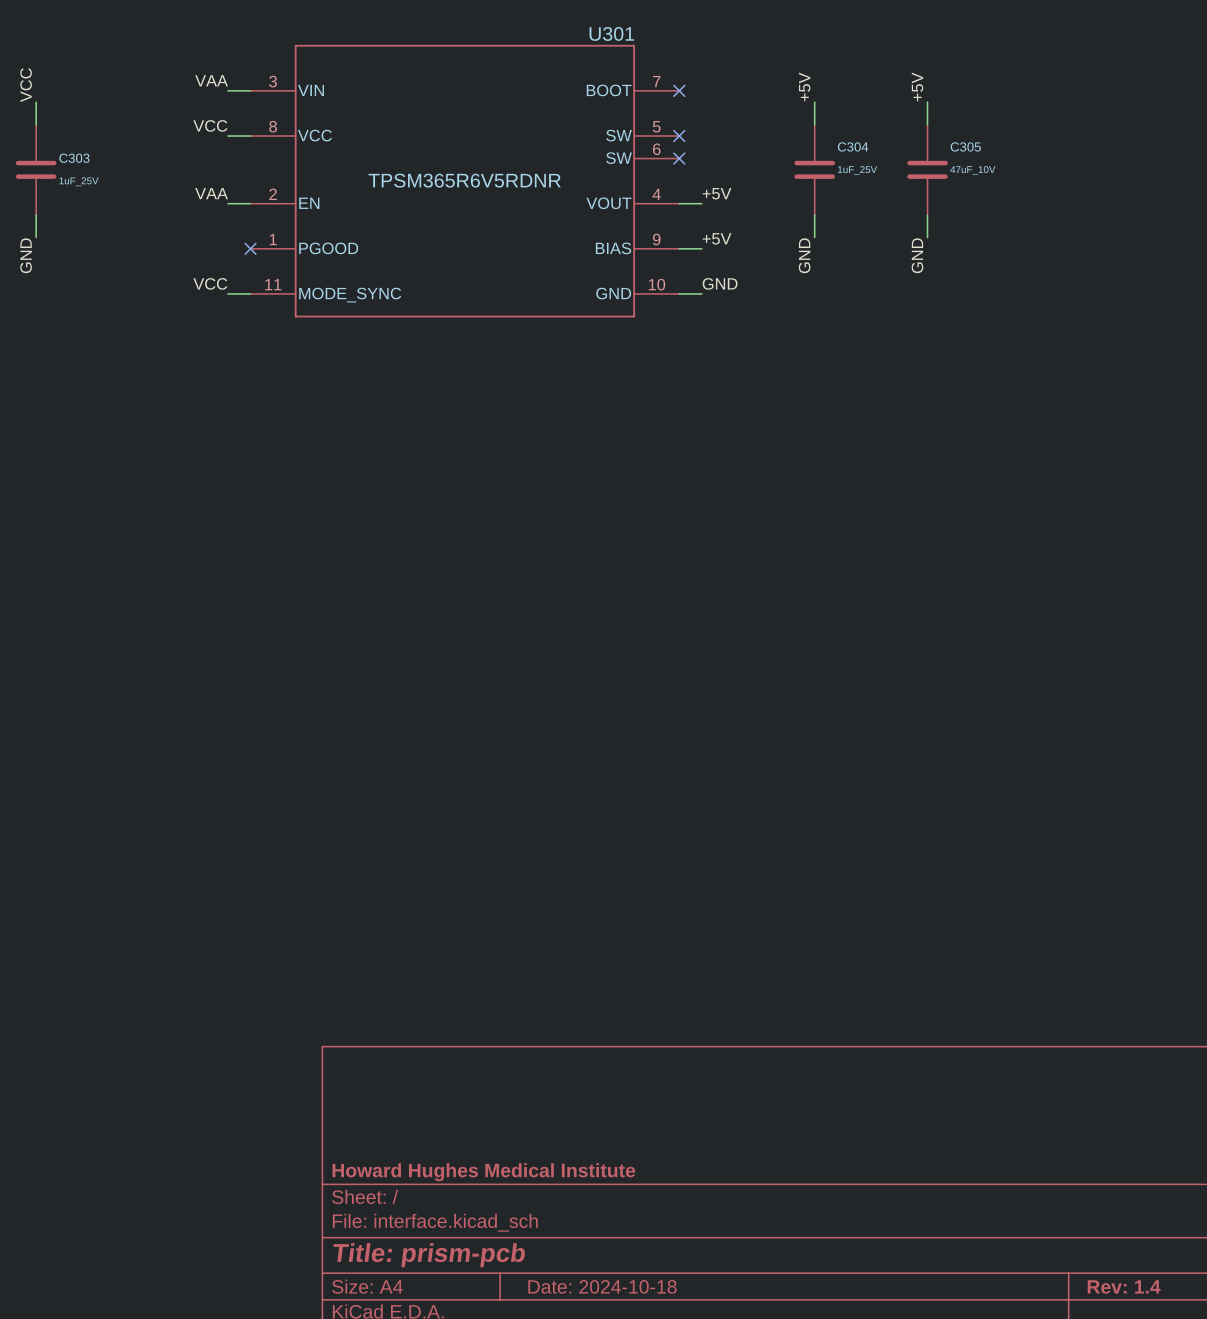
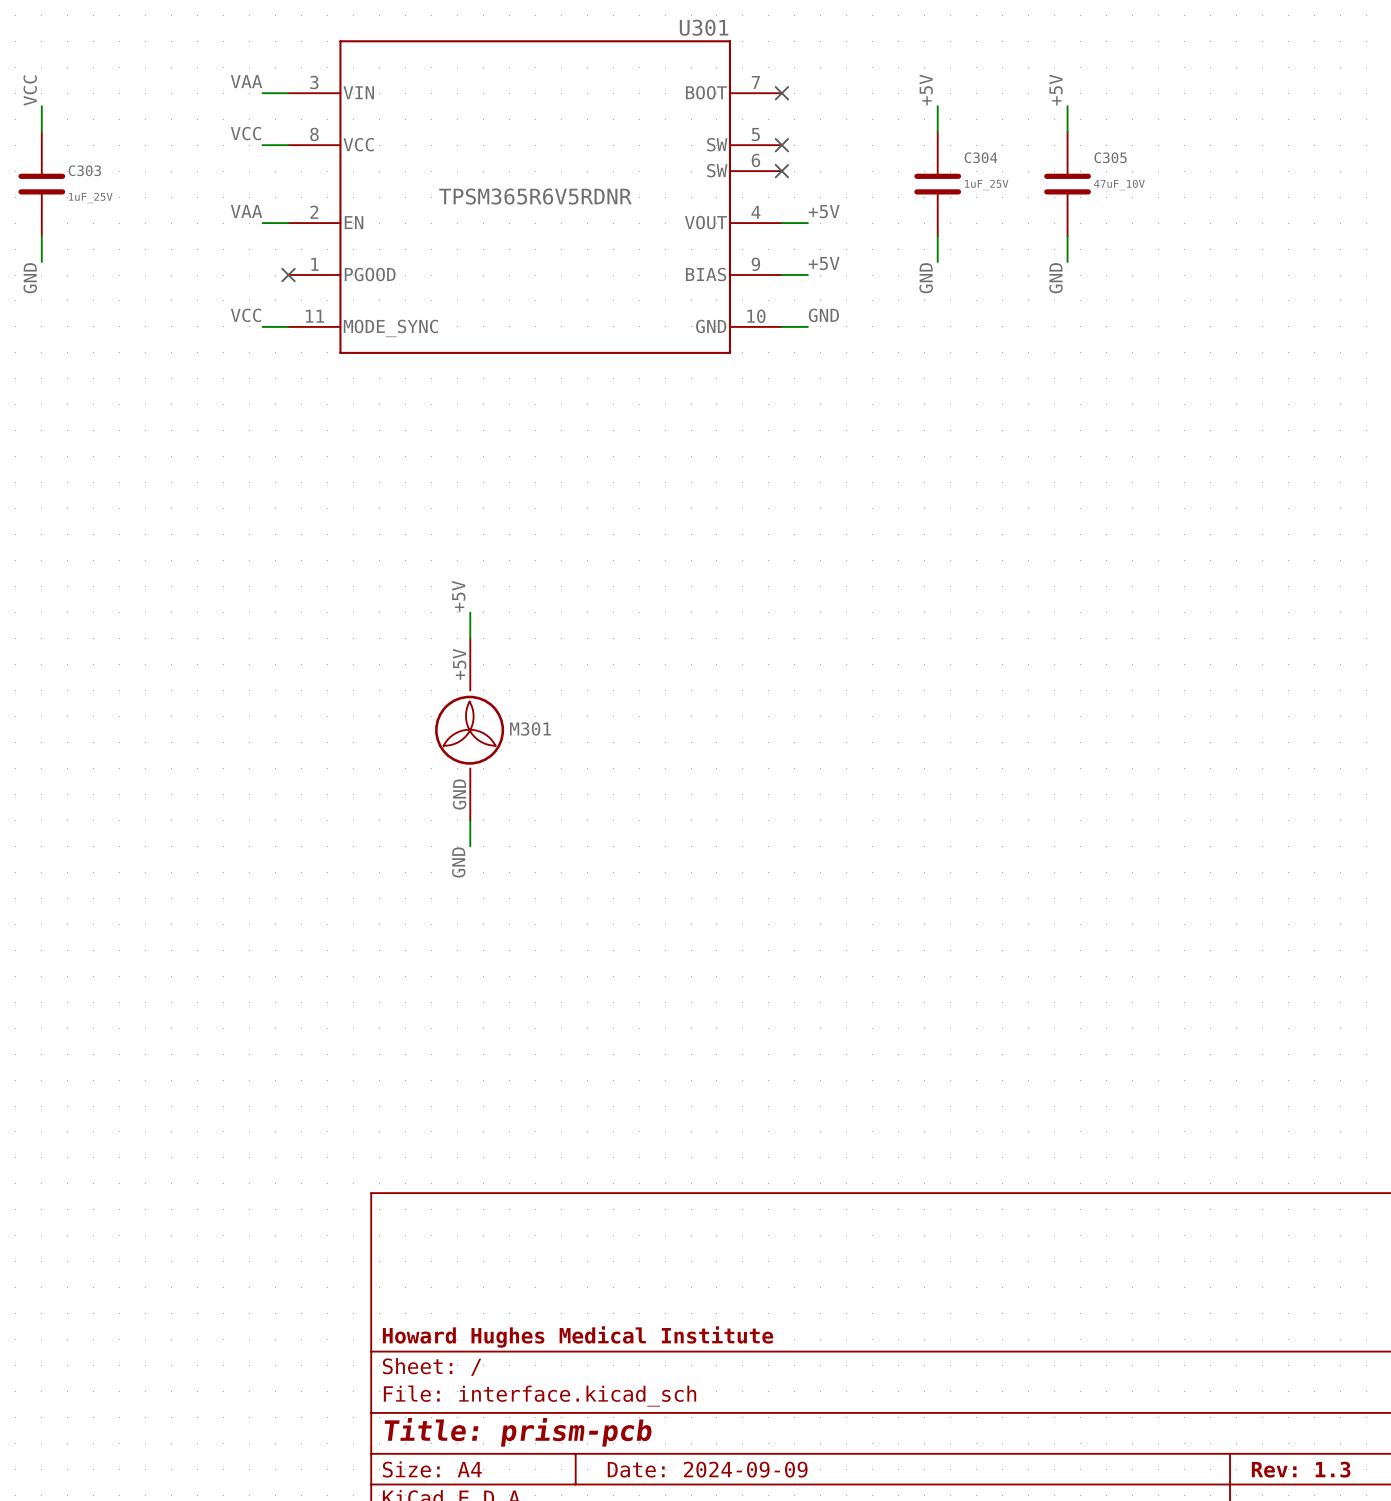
label: none -> +5V (458, 596)
wire: none -> (470, 612) (470, 638)
M301: none -> (469, 729)
wire: none -> (470, 820) (470, 846)
label: none -> GND (458, 862)
title block: Date: 2024-10-18 (602, 1286) -> Date: 2024-09-09 (707, 1469)
title block: Rev: 1.4 (1124, 1287) -> Rev: 1.3 (1301, 1469)

